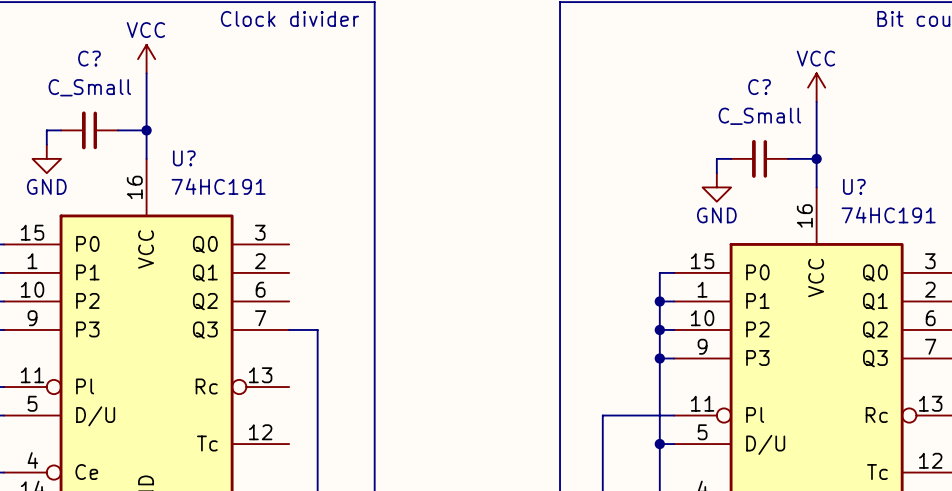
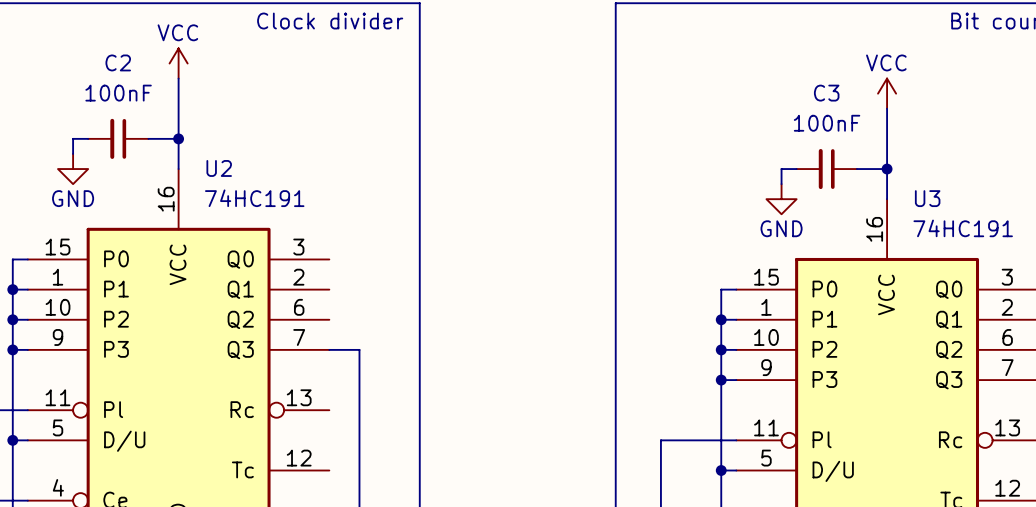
C? name: C? (89, 58) -> C2 (118, 62)
C? value: C_Small (89, 87) -> 100nF (118, 93)
C? name: C? (759, 87) -> C3 (826, 93)
C? value: C_Small (759, 116) -> 100nF (827, 123)
U? name: U? (184, 158) -> U2 (219, 168)
U? name: U? (854, 186) -> U3 (927, 198)

